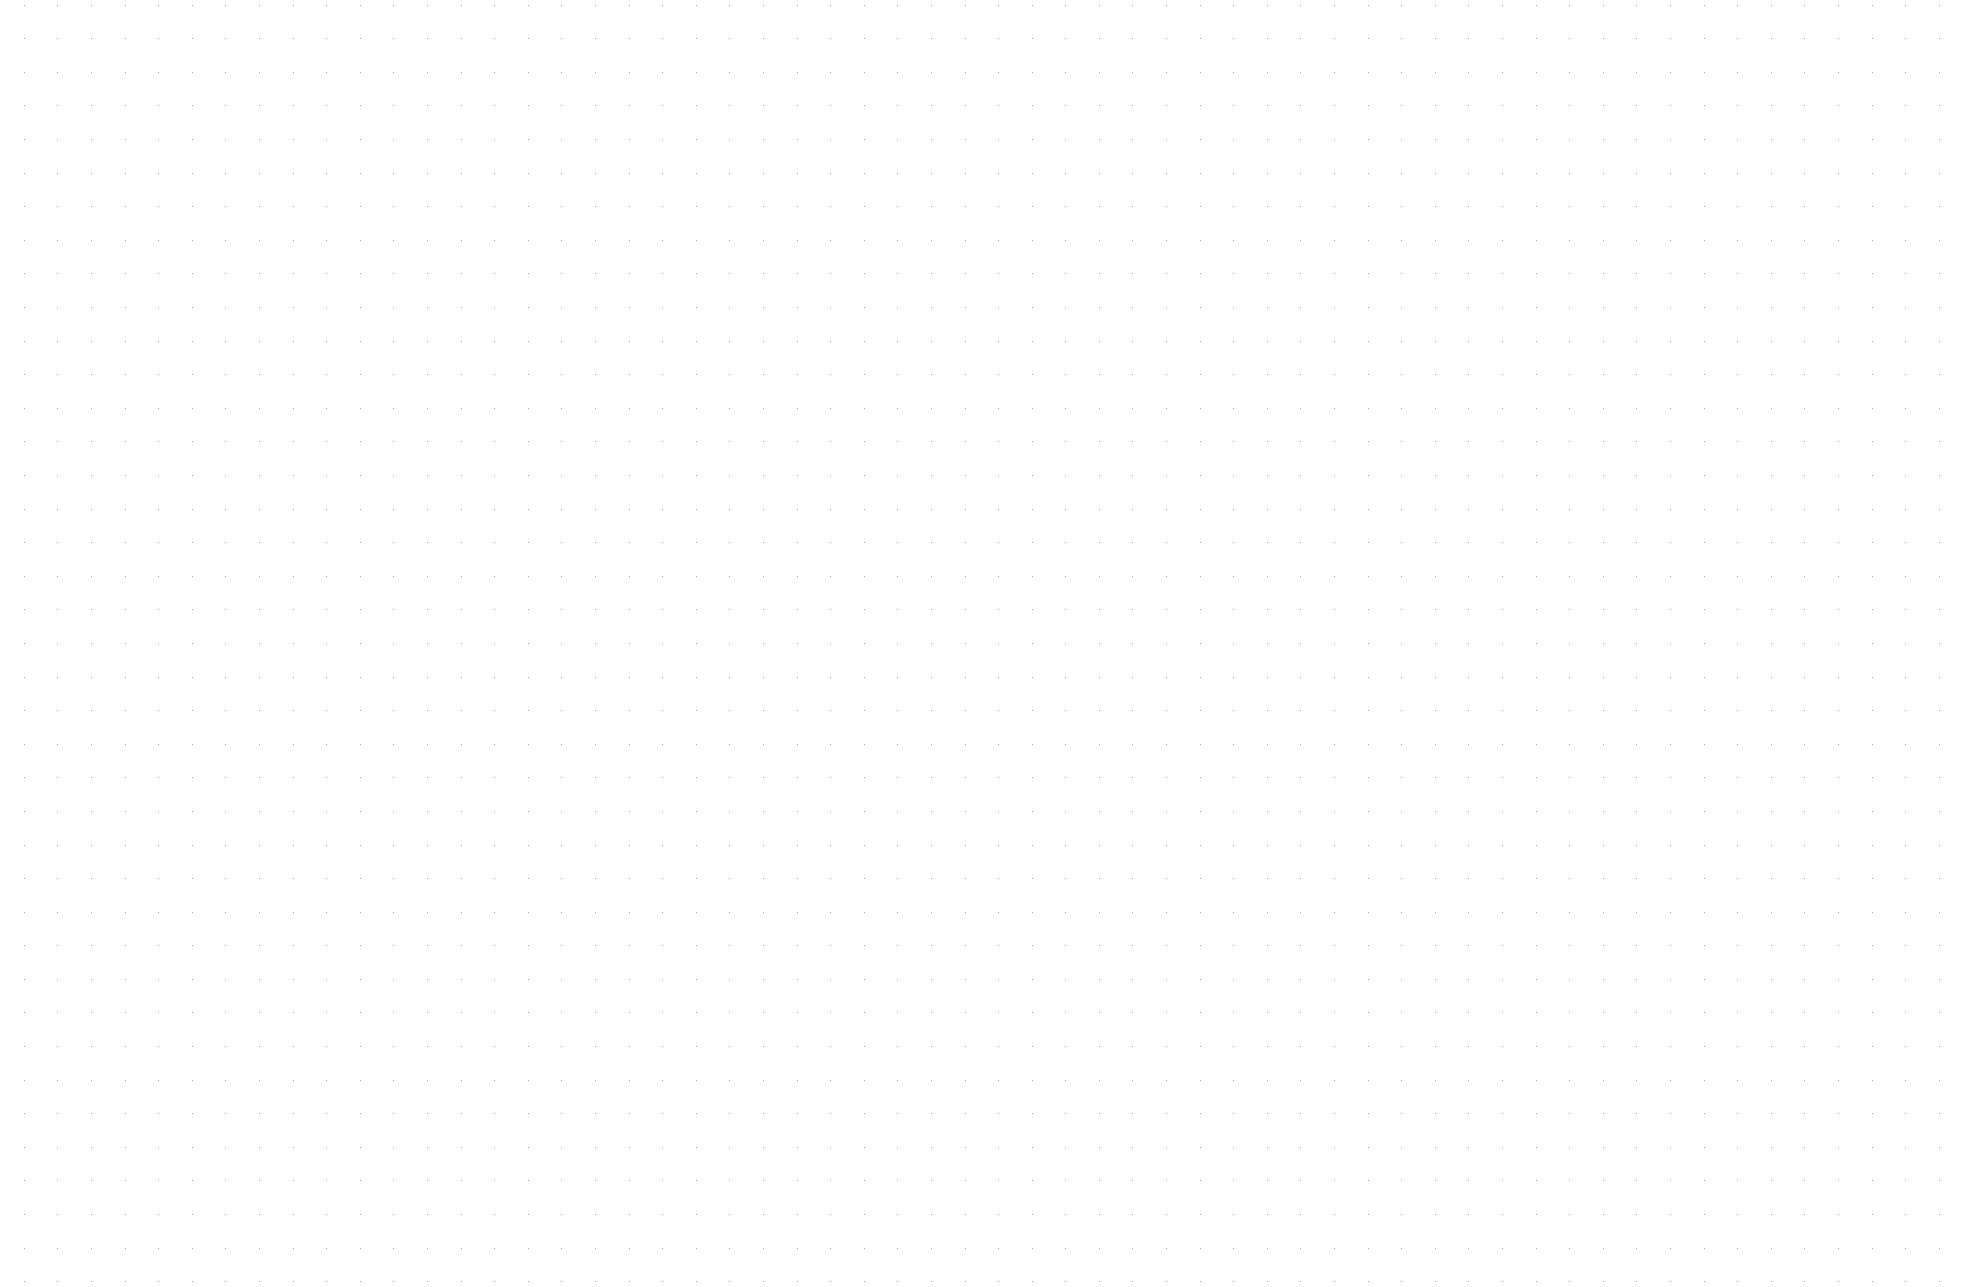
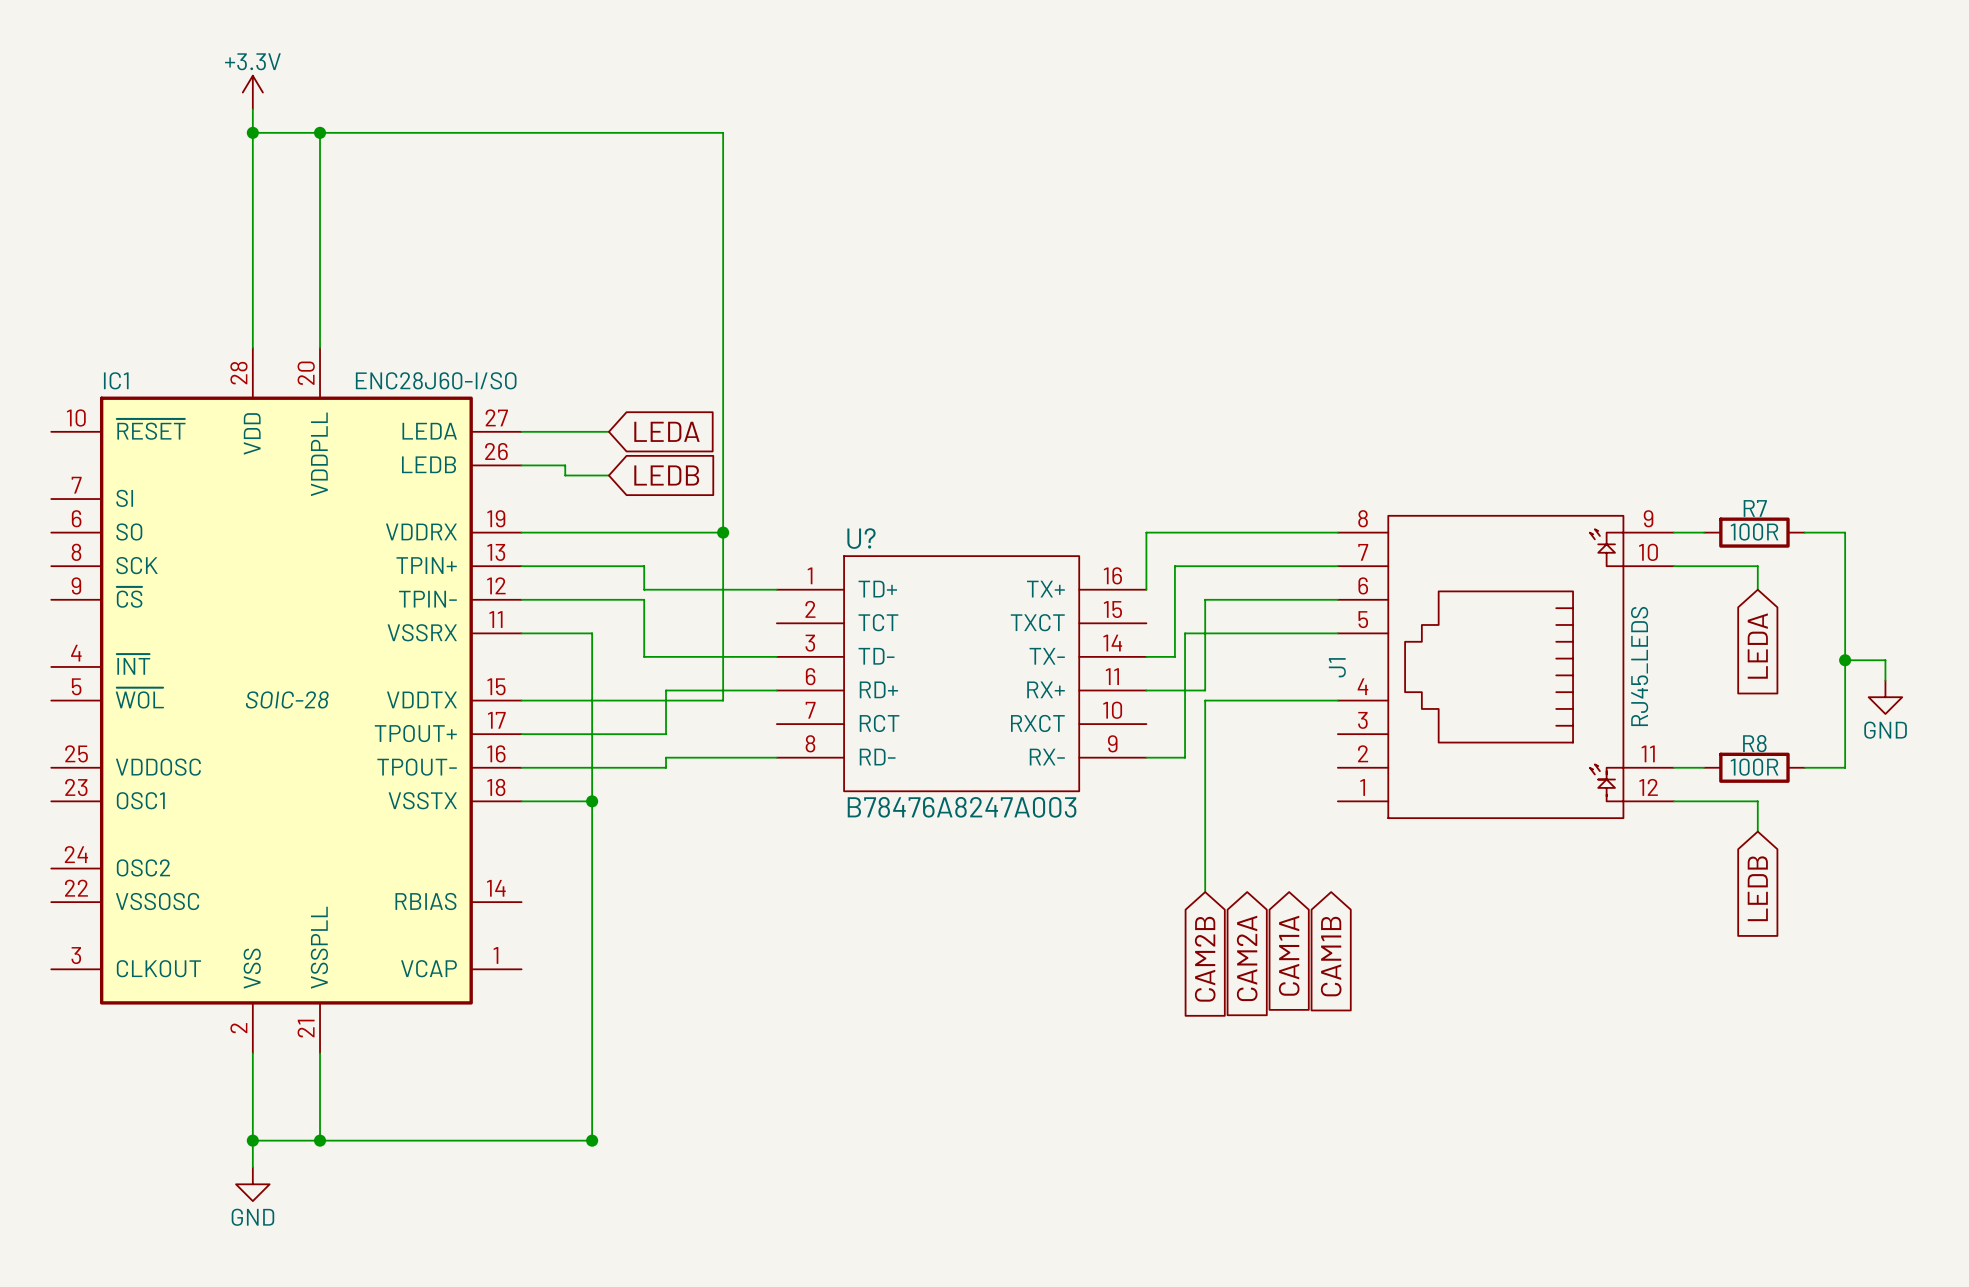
power symbol: none -> +3.3V (252, 92)
wire: none -> (252, 109) (252, 347)
wire: none -> (252, 132) (723, 132) (723, 700) (521, 700)
junction: none -> (252, 132)
wire: none -> (320, 132) (320, 347)
junction: none -> (320, 132)
wire: none -> (521, 431) (608, 431)
global label: none -> LEDA (666, 431)
wire: none -> (521, 465) (565, 465) (565, 475) (608, 475)
global label: none -> LEDB (666, 475)
wire: none -> (521, 532) (723, 532)
junction: none -> (723, 532)
wire: none -> (1337, 532) (1146, 532) (1146, 589)
wire: none -> (1673, 532) (1704, 532)
R7: none -> 100R (1754, 532)
wire: none -> (1804, 532) (1845, 532) (1845, 767) (1804, 767)
wire: none -> (521, 566) (644, 566) (644, 589) (776, 589)
wire: none -> (1337, 566) (1174, 566) (1174, 656) (1146, 656)
wire: none -> (1673, 566) (1757, 566) (1757, 589)
wire: none -> (521, 599) (644, 599) (644, 656) (776, 656)
wire: none -> (1337, 599) (1205, 599) (1205, 690) (1146, 690)
wire: none -> (521, 633) (592, 633) (592, 1140) (252, 1140)
wire: none -> (1337, 633) (1185, 633) (1185, 757) (1146, 757)
global label: none -> LEDA (1757, 646)
wire: none -> (1845, 660) (1885, 660) (1885, 680)
junction: none -> (1845, 660)
J1: none -> RJ45_LEDS (1505, 666)
U?: none -> B78476A8247A003 (961, 673)
wire: none -> (776, 690) (666, 690) (666, 734) (521, 734)
power symbol: none -> GND (1885, 697)
IC1: none -> ENC28J60-I/SO (286, 700)
wire: none -> (1337, 700) (1205, 700) (1205, 892)
wire: none -> (776, 757) (666, 757) (666, 767) (521, 767)
wire: none -> (1673, 767) (1704, 767)
R8: none -> 100R (1754, 767)
wire: none -> (521, 801) (592, 801)
junction: none -> (592, 801)
wire: none -> (1673, 801) (1757, 801) (1757, 831)
global label: none -> LEDB (1757, 888)
global label: none -> CAM2A (1247, 958)
global label: none -> CAM1A (1289, 955)
global label: none -> CAM2B (1205, 959)
global label: none -> CAM1B (1331, 956)
wire: none -> (252, 1053) (252, 1167)
wire: none -> (320, 1053) (320, 1140)
junction: none -> (252, 1140)
junction: none -> (320, 1140)
junction: none -> (592, 1140)
power symbol: none -> GND (252, 1184)

